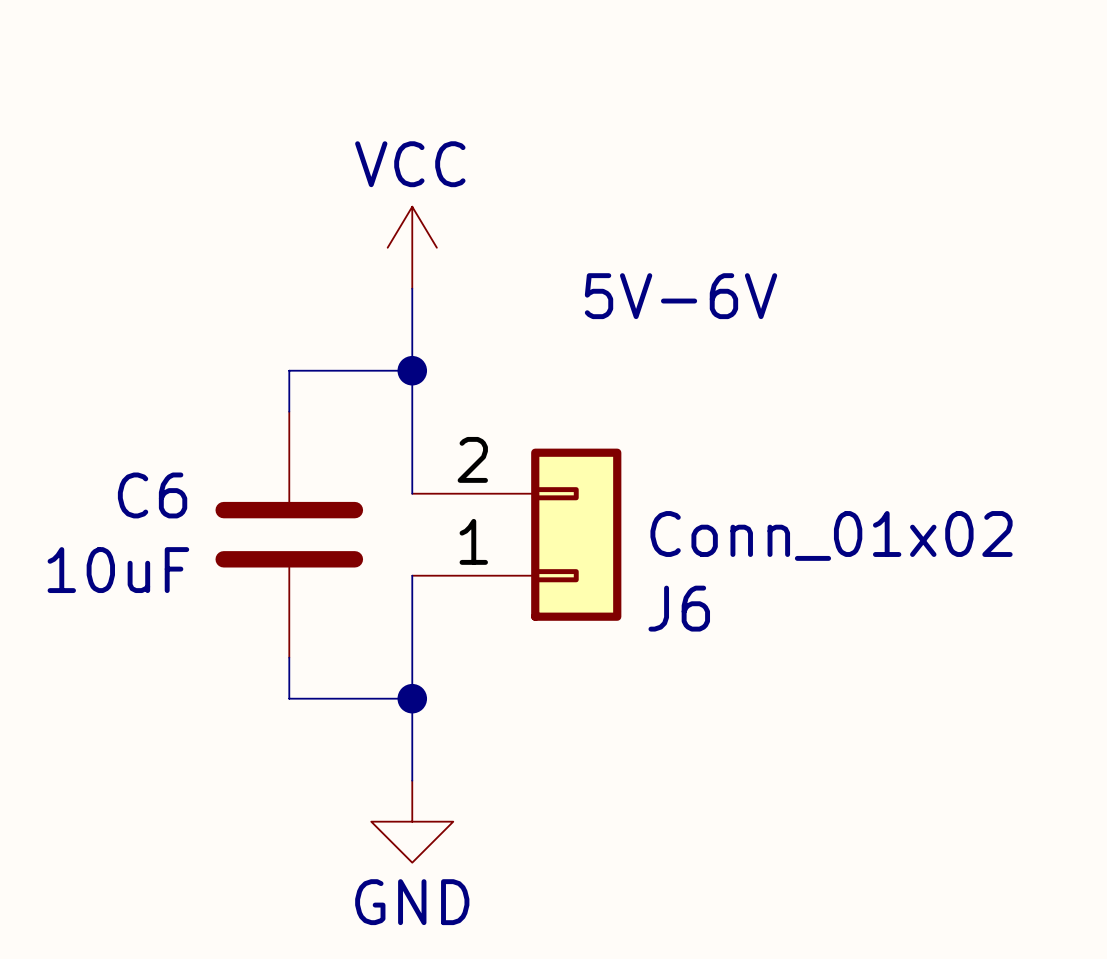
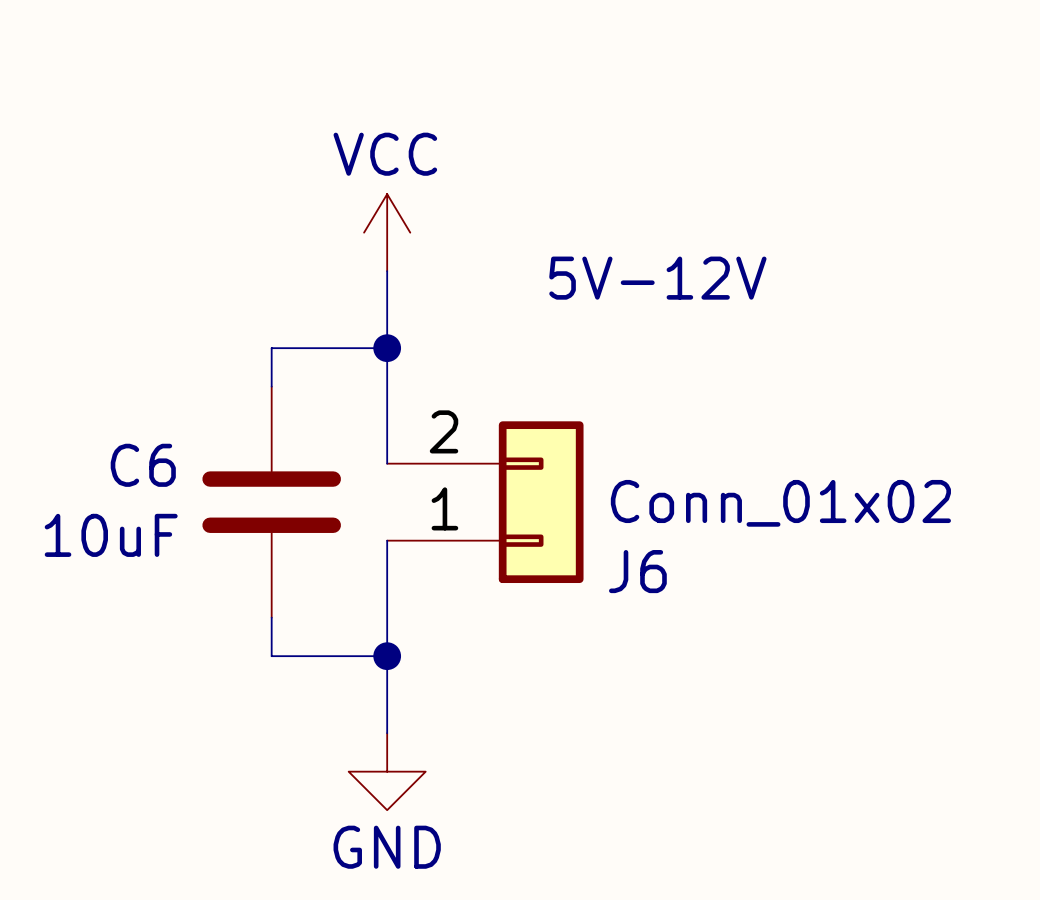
text: 5V-6V (681, 296) -> 5V-12V (657, 278)

